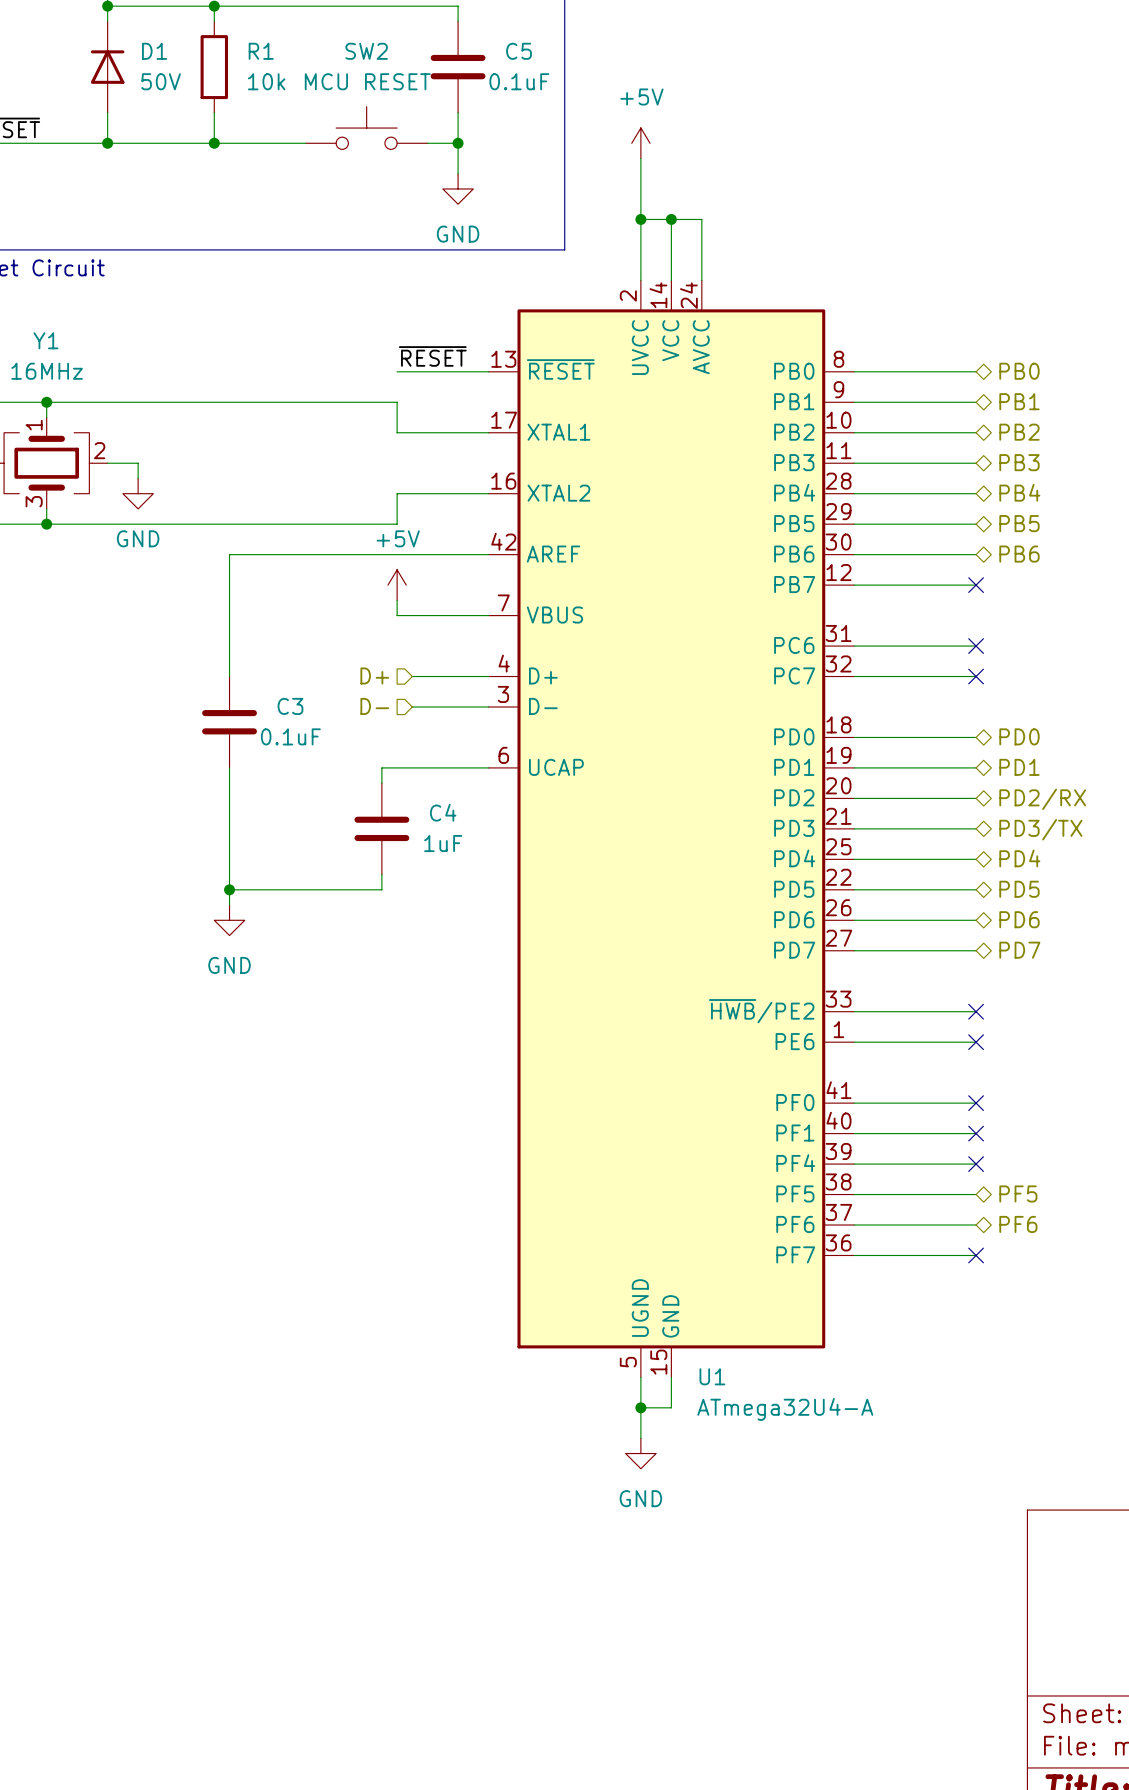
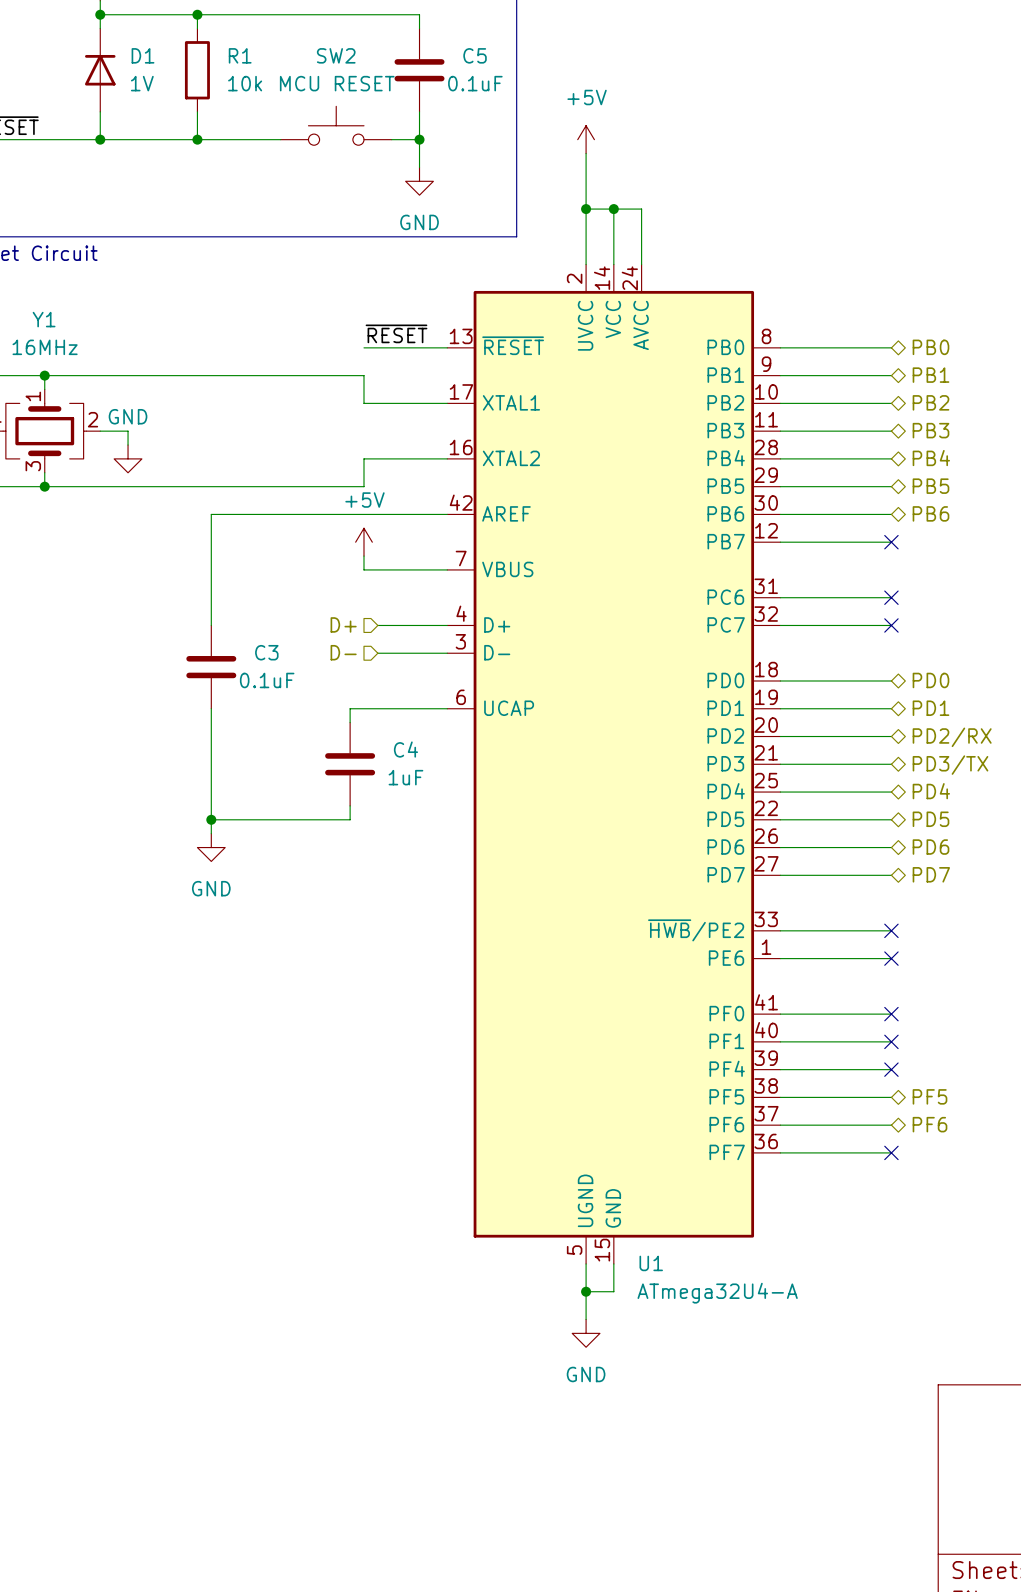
D1 value: 50V (161, 81) -> 1V (142, 83)
power symbol text position: GND (138, 538) -> GND (128, 416)

